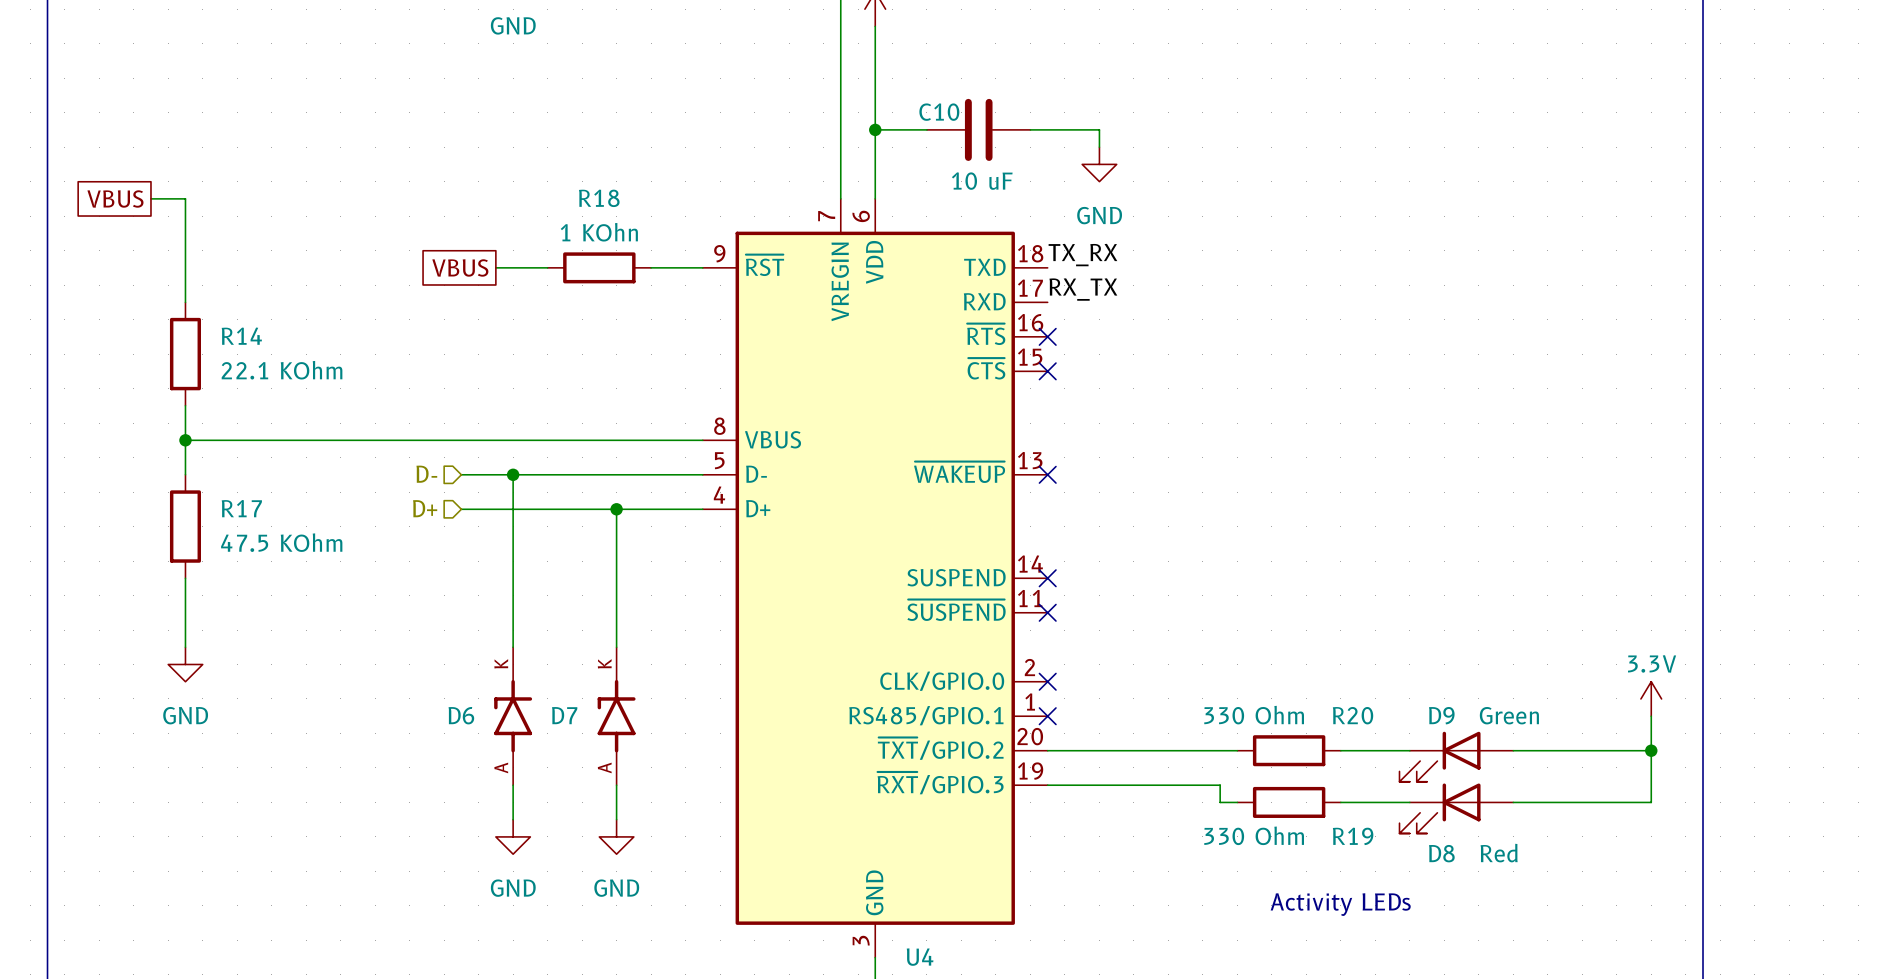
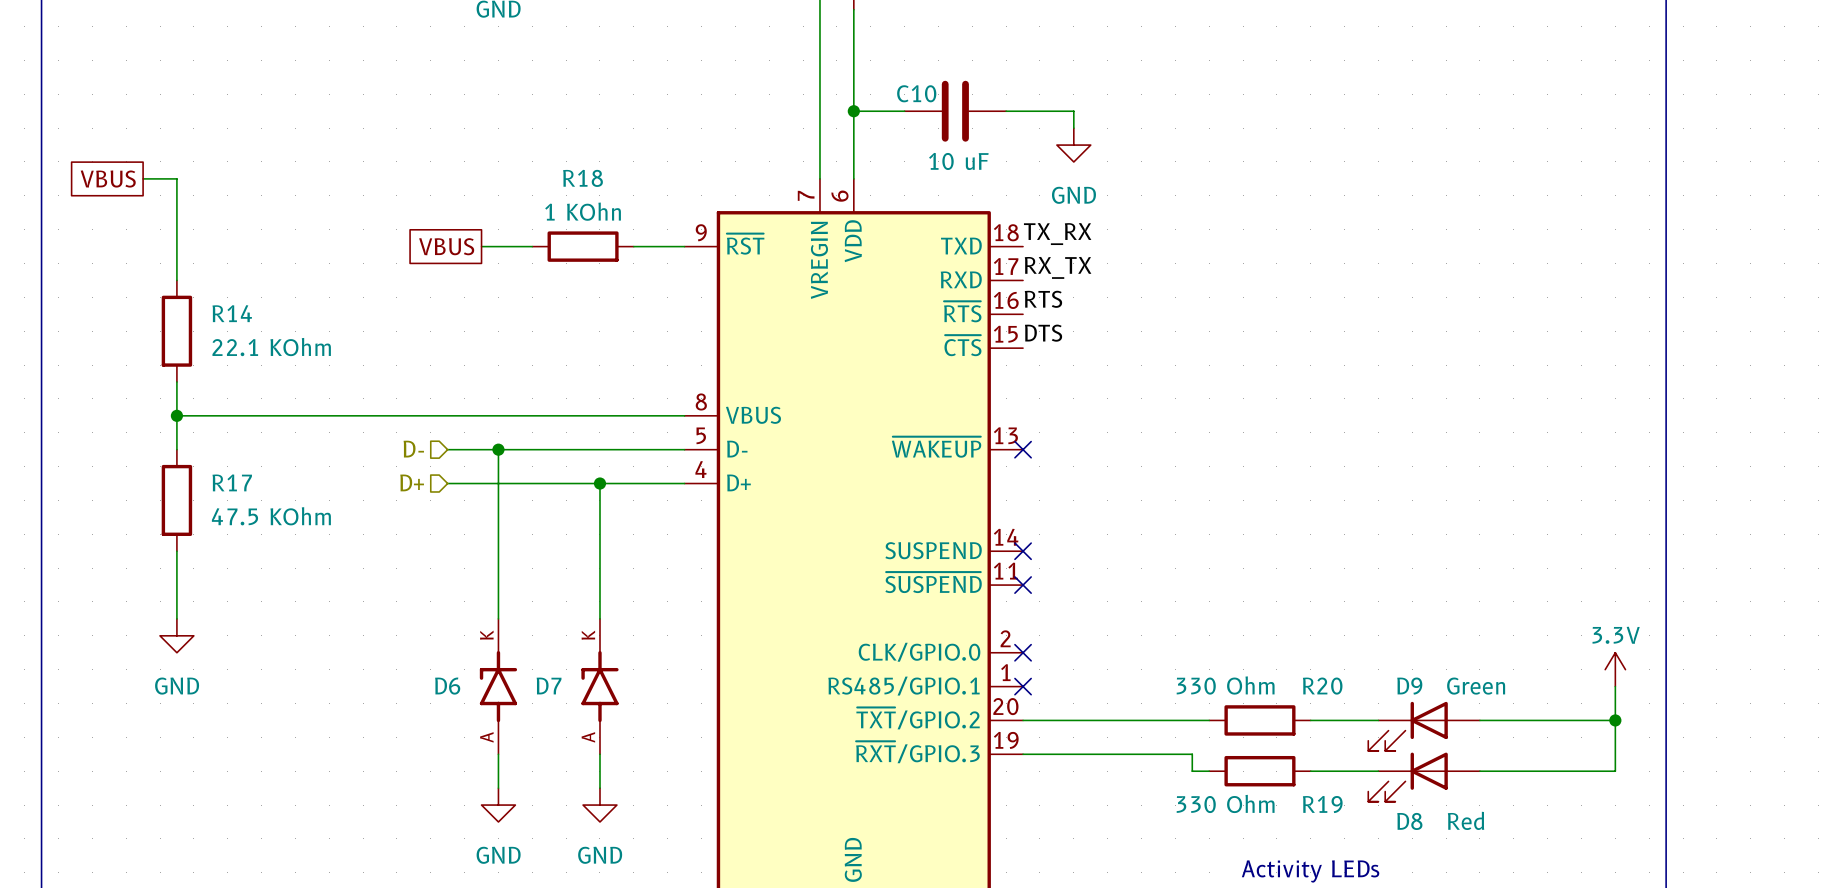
label: none -> RTS (1043, 299)
no-connect mark: (1047, 336) -> none
label: none -> DTS (1043, 333)
no-connect mark: (1047, 371) -> none

